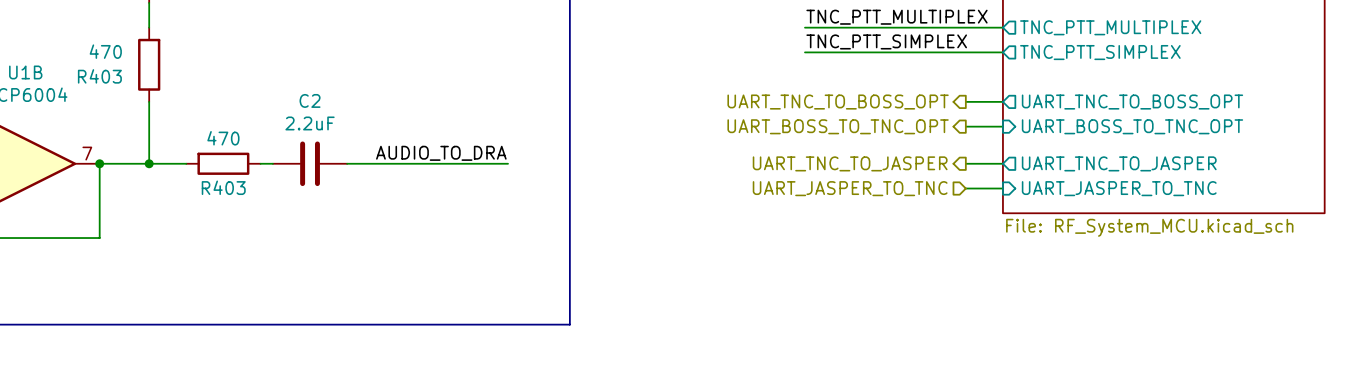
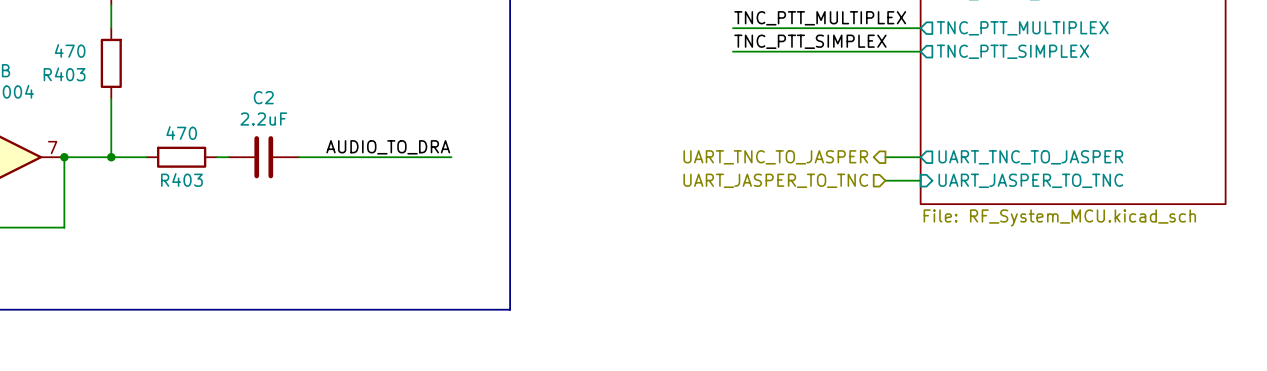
wire: (965, 101) (1002, 101) -> none
hierarchical label: UART_TNC_TO_BOSS_OPT (838, 102) -> none
sheet pin: UART_TNC_TO_BOSS_OPT (1132, 102) -> none
hierarchical label: UART_BOSS_TO_TNC_OPT (838, 126) -> none
wire: (965, 126) (1002, 126) -> none
sheet pin: UART_BOSS_TO_TNC_OPT (1132, 126) -> none

